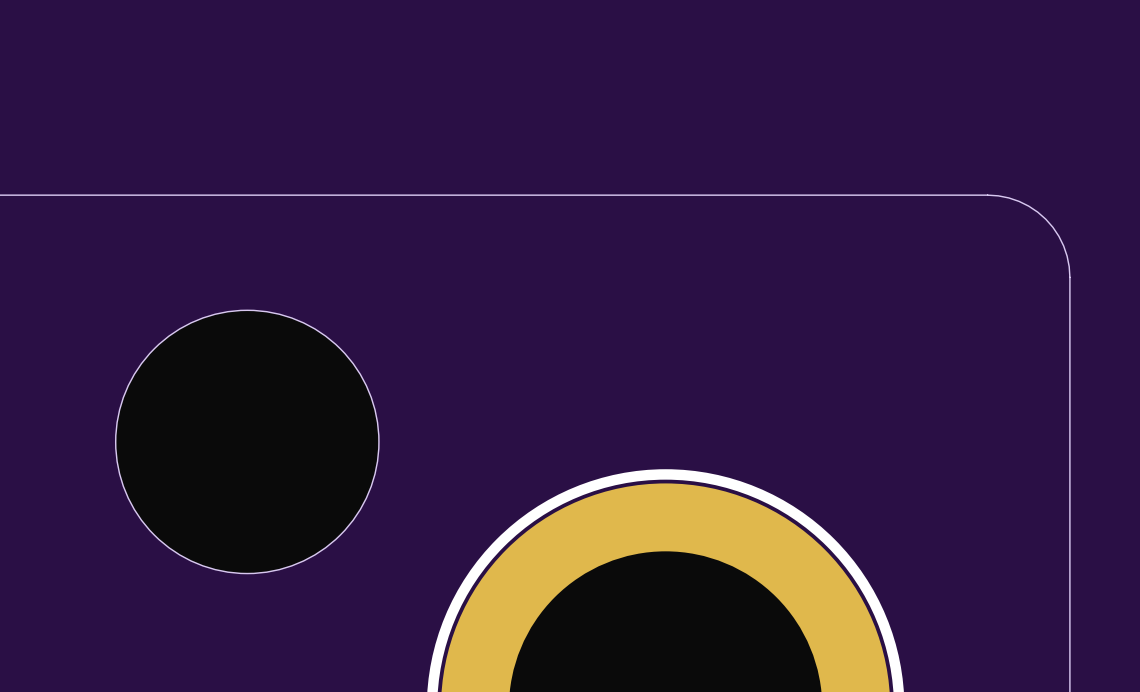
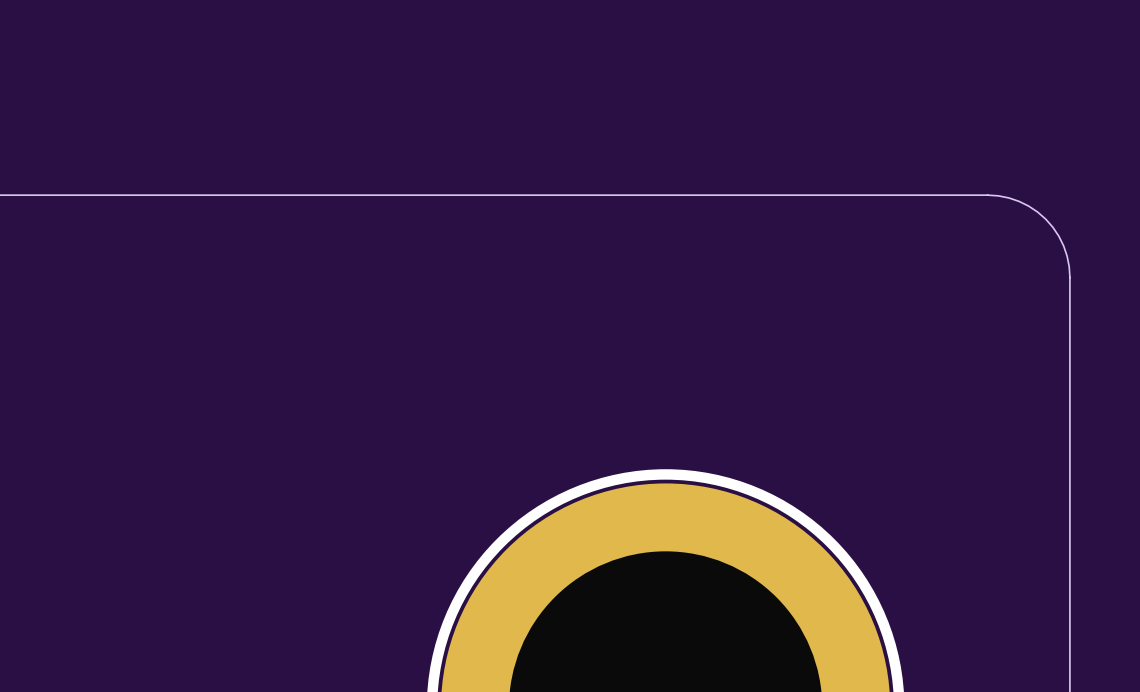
hole: (247, 441) -> none

